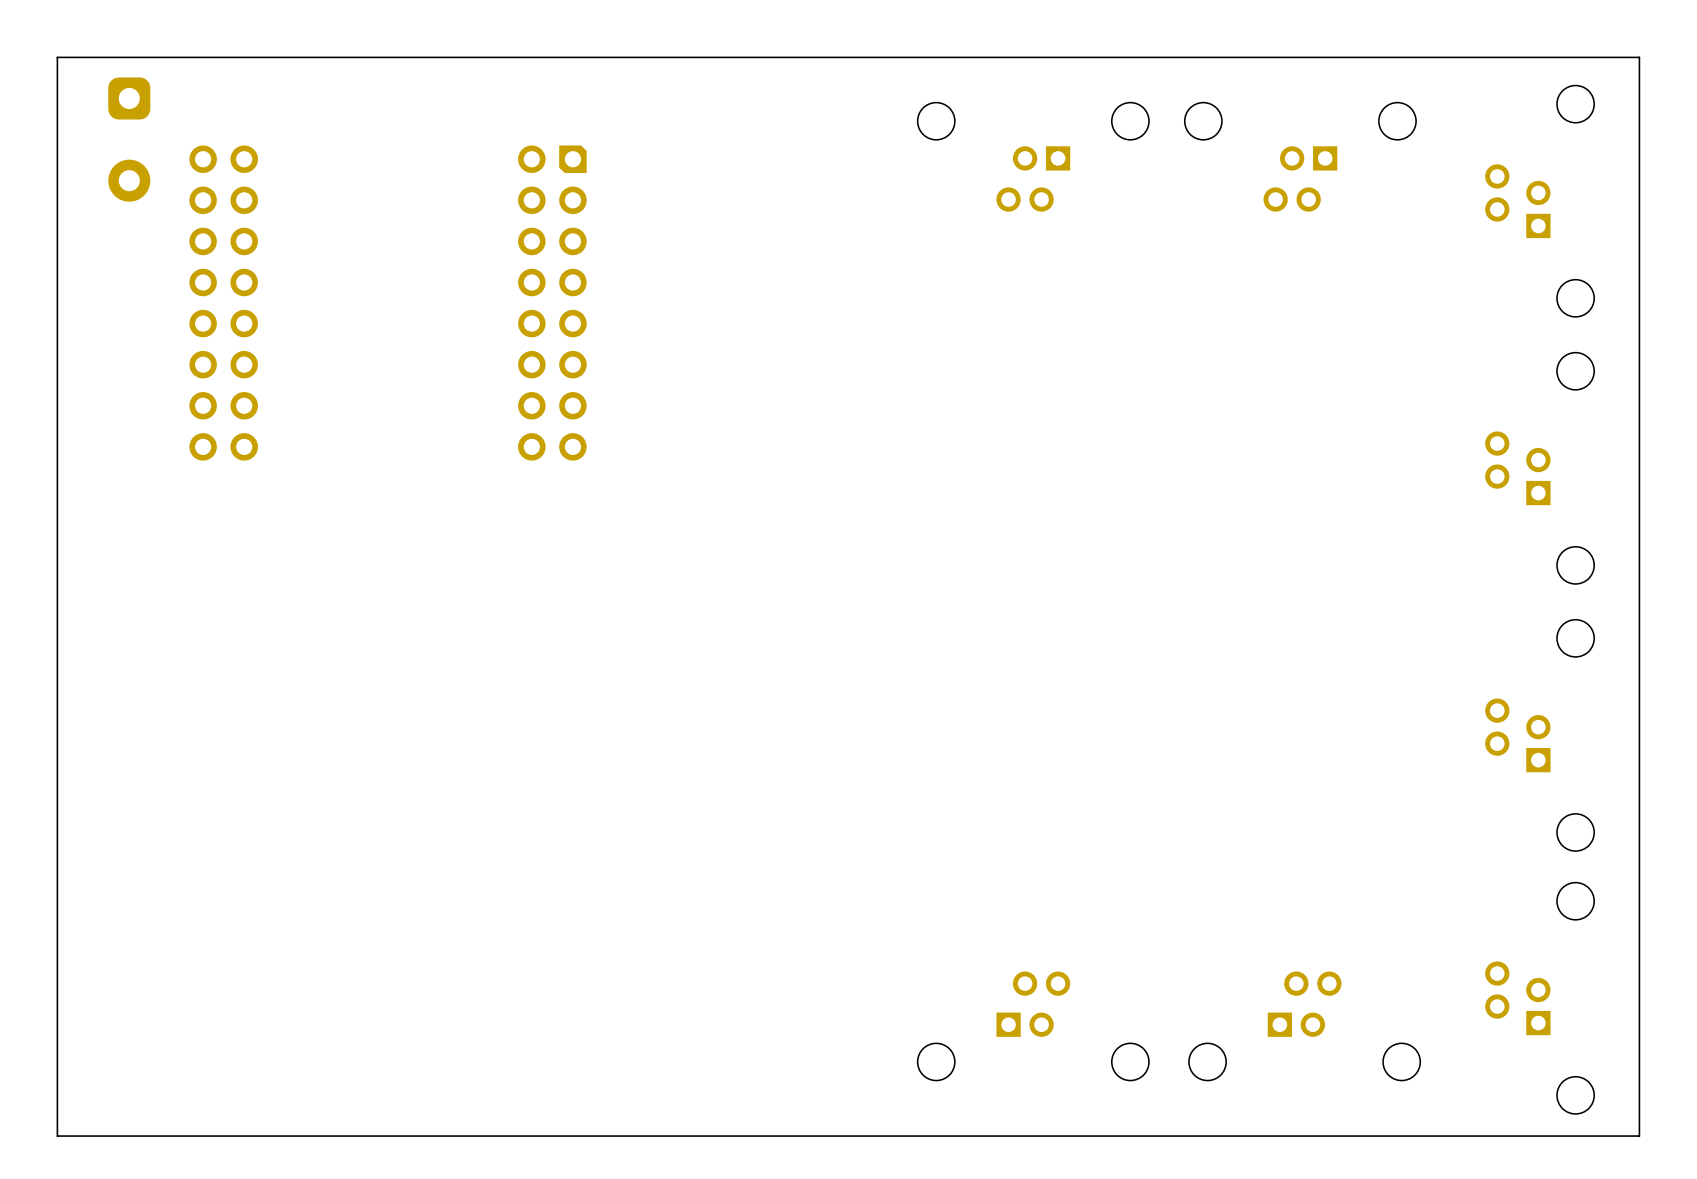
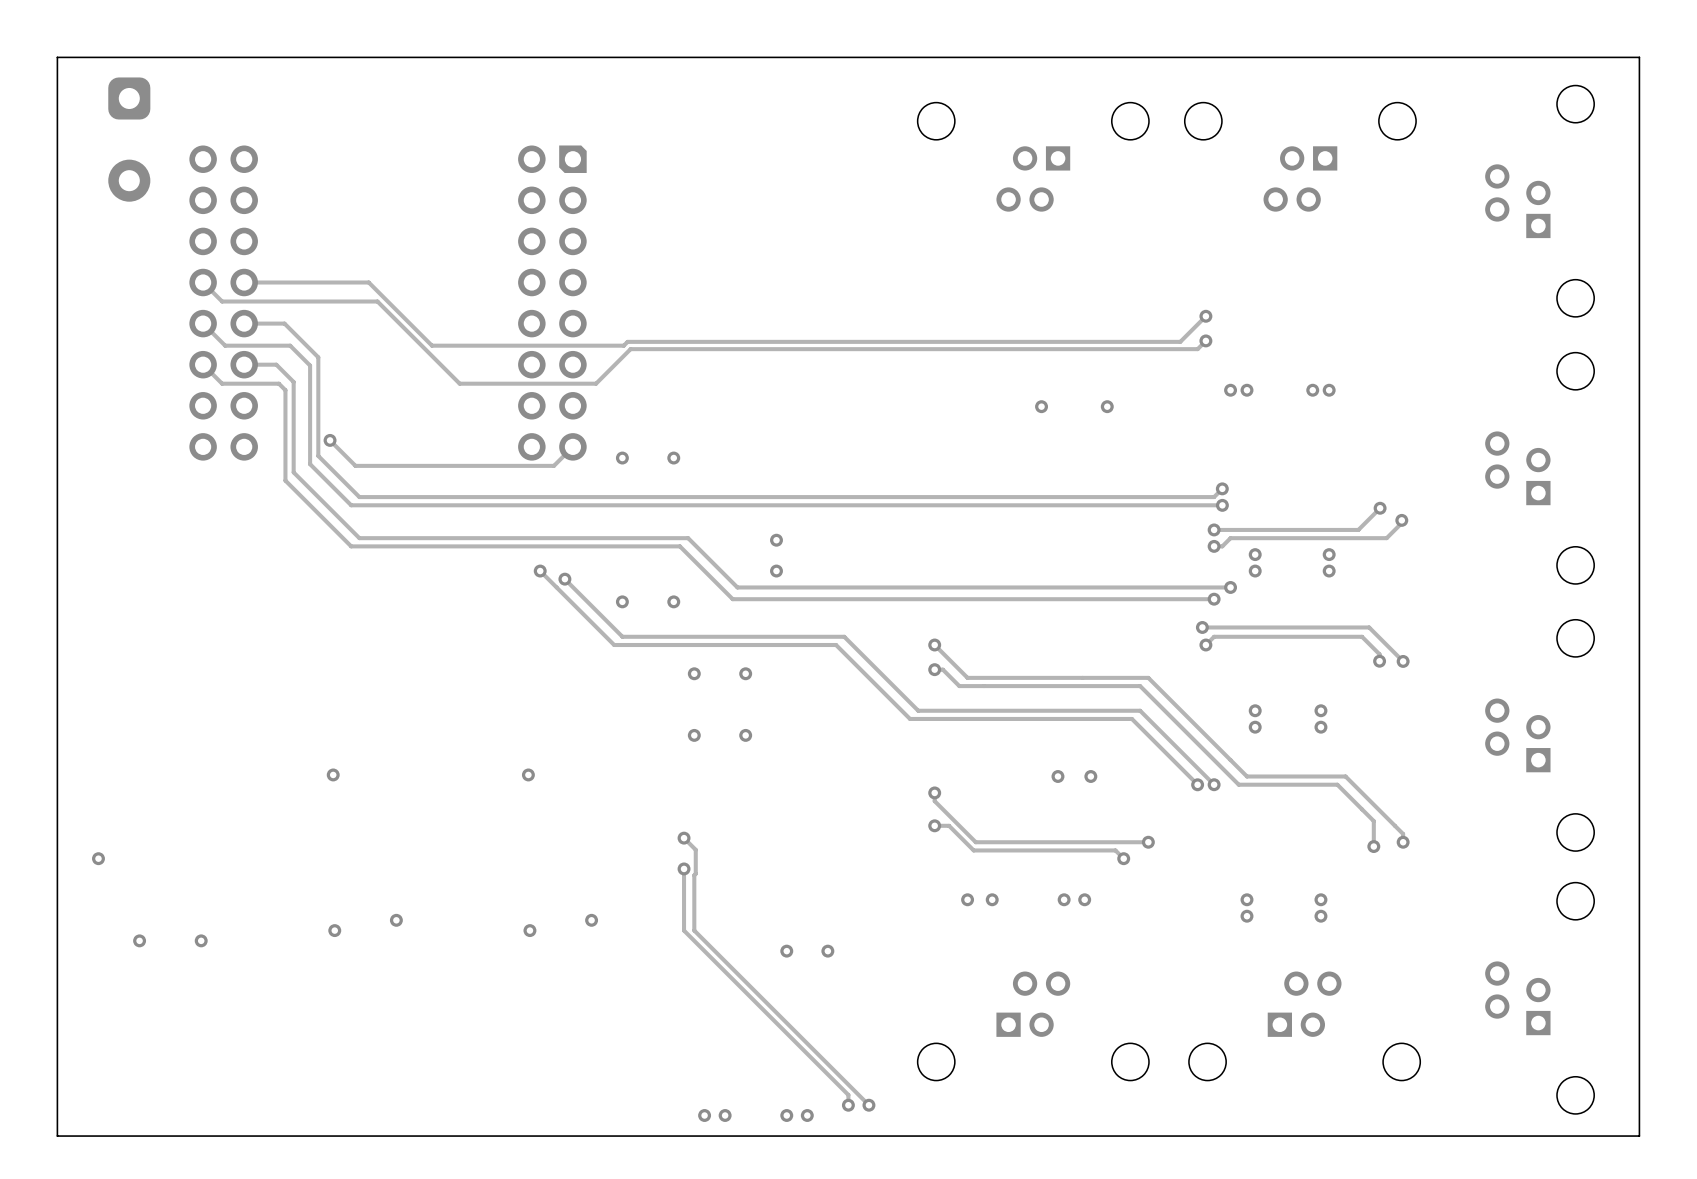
track: none -> (203, 282) (222, 301) (377, 301) (459, 383) (596, 383) (630, 349) (1197, 349) (1205, 340)
track: none -> (244, 282) (368, 282) (431, 345) (623, 345) (627, 341) (1180, 341) (1205, 316)
via: none -> (1205, 316)
track: none -> (203, 323) (225, 345) (290, 345) (310, 365) (310, 464) (351, 505) (1222, 505)
track: none -> (244, 323) (284, 323) (318, 357) (318, 455) (359, 497) (1214, 497) (1222, 488)
via: none -> (1205, 340)
track: none -> (203, 364) (222, 383) (278, 383) (285, 390) (285, 480) (351, 546) (679, 546) (732, 599) (1214, 599)
track: none -> (244, 364) (276, 364) (293, 382) (293, 472) (359, 538) (688, 538) (737, 587) (1230, 587)
via: none -> (1230, 390)
via: none -> (1246, 390)
via: none -> (1312, 390)
via: none -> (1329, 390)
via: none -> (1041, 406)
via: none -> (1107, 406)
track: none -> (330, 440) (355, 465) (553, 465) (572, 446)
via: none -> (330, 440)
via: none -> (622, 458)
via: none -> (673, 458)
via: none -> (1222, 488)
via: none -> (1222, 505)
track: none -> (1380, 508) (1358, 529) (1214, 529)
via: none -> (1380, 508)
track: none -> (1401, 520) (1401, 523) (1386, 538) (1230, 538) (1222, 546) (1214, 546)
via: none -> (1401, 520)
via: none -> (1214, 529)
via: none -> (776, 540)
via: none -> (1214, 546)
via: none -> (1255, 554)
via: none -> (1329, 554)
track: none -> (540, 571) (614, 645) (836, 645) (910, 718) (1131, 718) (1197, 784)
via: none -> (540, 571)
via: none -> (776, 571)
via: none -> (1255, 571)
via: none -> (1329, 571)
track: none -> (564, 579) (622, 636) (844, 636) (918, 710) (1140, 710) (1214, 784)
via: none -> (564, 579)
via: none -> (1230, 587)
via: none -> (1214, 599)
via: none -> (622, 601)
via: none -> (673, 601)
track: none -> (1202, 627) (1369, 627) (1403, 661)
via: none -> (1202, 627)
track: none -> (934, 645) (967, 677) (1148, 677) (1246, 776) (1345, 776) (1403, 834) (1403, 842)
via: none -> (934, 645)
track: none -> (1205, 645) (1214, 636) (1362, 636) (1379, 654) (1379, 661)
via: none -> (1205, 645)
via: none -> (1379, 661)
via: none -> (1403, 661)
track: none -> (934, 669) (942, 669) (959, 686) (1140, 686) (1238, 784) (1337, 784) (1373, 821) (1373, 846)
via: none -> (934, 669)
via: none -> (694, 673)
via: none -> (745, 673)
via: none -> (1255, 710)
via: none -> (1320, 710)
via: none -> (1255, 727)
via: none -> (1320, 727)
via: none -> (694, 735)
via: none -> (745, 735)
via: none -> (333, 774)
via: none -> (528, 774)
via: none -> (1057, 776)
via: none -> (1090, 776)
via: none -> (1197, 784)
via: none -> (1214, 784)
track: none -> (934, 792) (934, 801) (975, 842) (1148, 842)
via: none -> (934, 792)
track: none -> (934, 825) (949, 825) (973, 850) (1115, 850) (1123, 858)
via: none -> (934, 825)
track: none -> (684, 838) (695, 849) (694, 930) (868, 1105)
via: none -> (684, 838)
via: none -> (1148, 842)
via: none -> (1403, 842)
via: none -> (1373, 846)
via: none -> (98, 858)
via: none -> (1123, 858)
track: none -> (684, 868) (684, 930) (848, 1094) (848, 1105)
via: none -> (684, 868)
via: none -> (967, 899)
via: none -> (992, 899)
via: none -> (1064, 899)
via: none -> (1084, 899)
via: none -> (1246, 899)
via: none -> (1320, 899)
via: none -> (1246, 916)
via: none -> (1320, 916)
via: none -> (396, 920)
via: none -> (591, 920)
via: none -> (334, 930)
via: none -> (529, 930)
via: none -> (139, 940)
via: none -> (201, 940)
via: none -> (786, 951)
via: none -> (827, 951)
via: none -> (848, 1105)
via: none -> (868, 1105)
via: none -> (704, 1115)
via: none -> (725, 1115)
via: none -> (786, 1115)
via: none -> (807, 1115)

